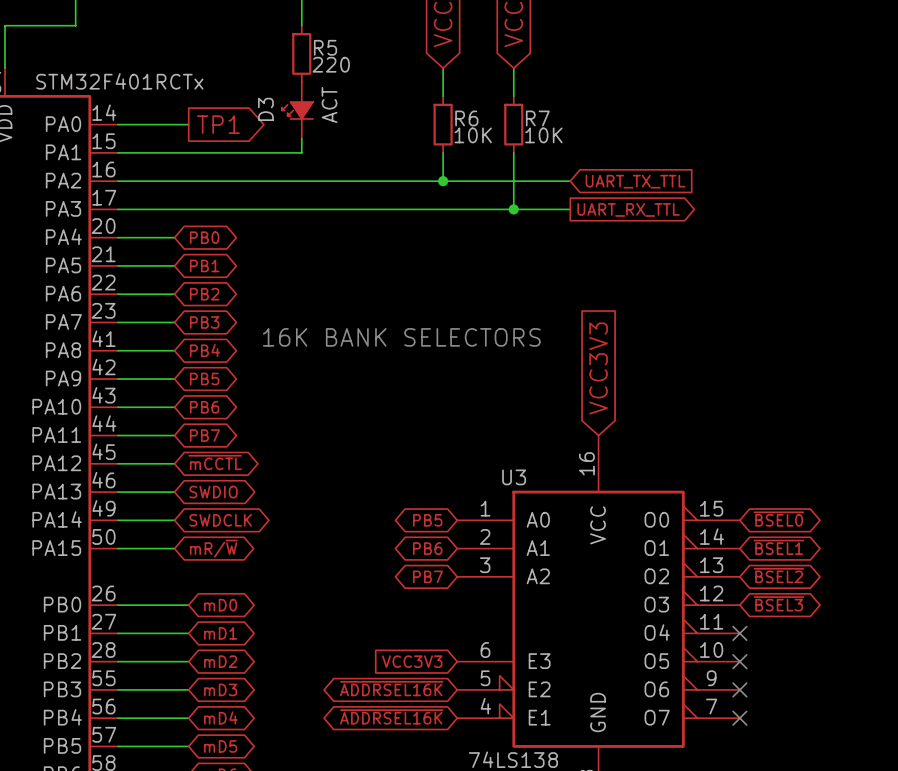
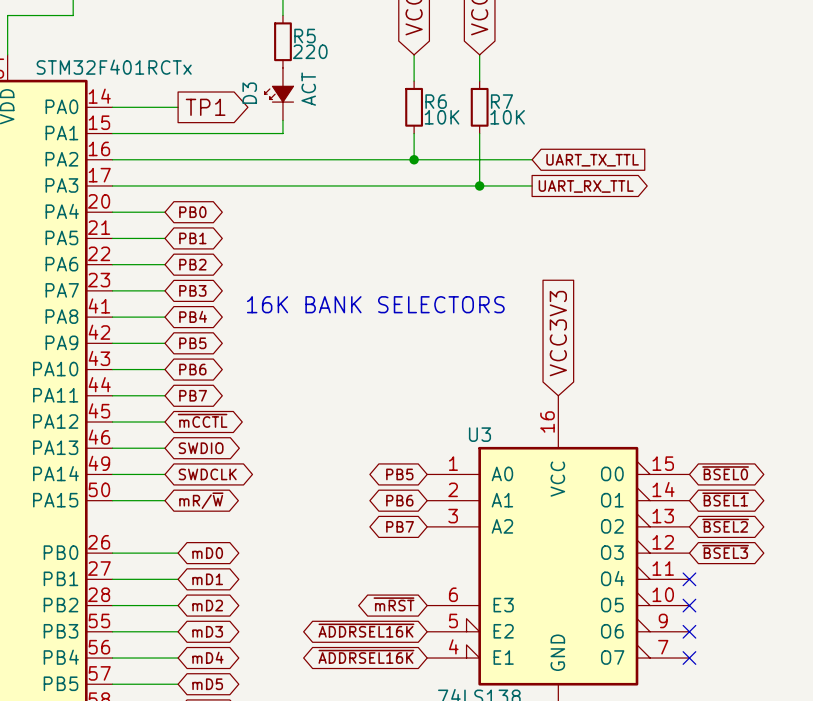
global label shape: input (412, 661) -> bidirectional (393, 604)
global label: VCC3V3 (412, 661) -> ~{mRST} (393, 604)

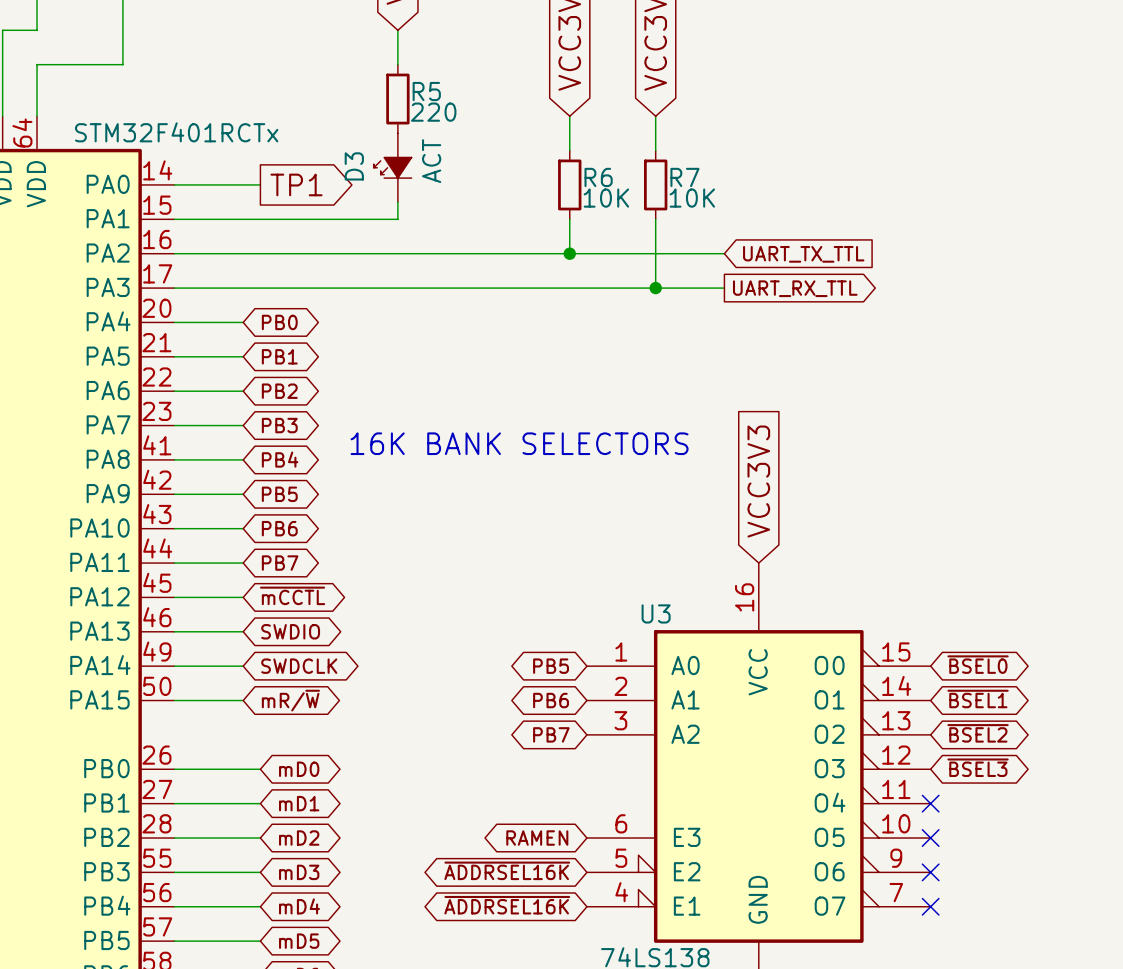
global label: ~{mRST} (393, 604) -> RAMEN (537, 838)

